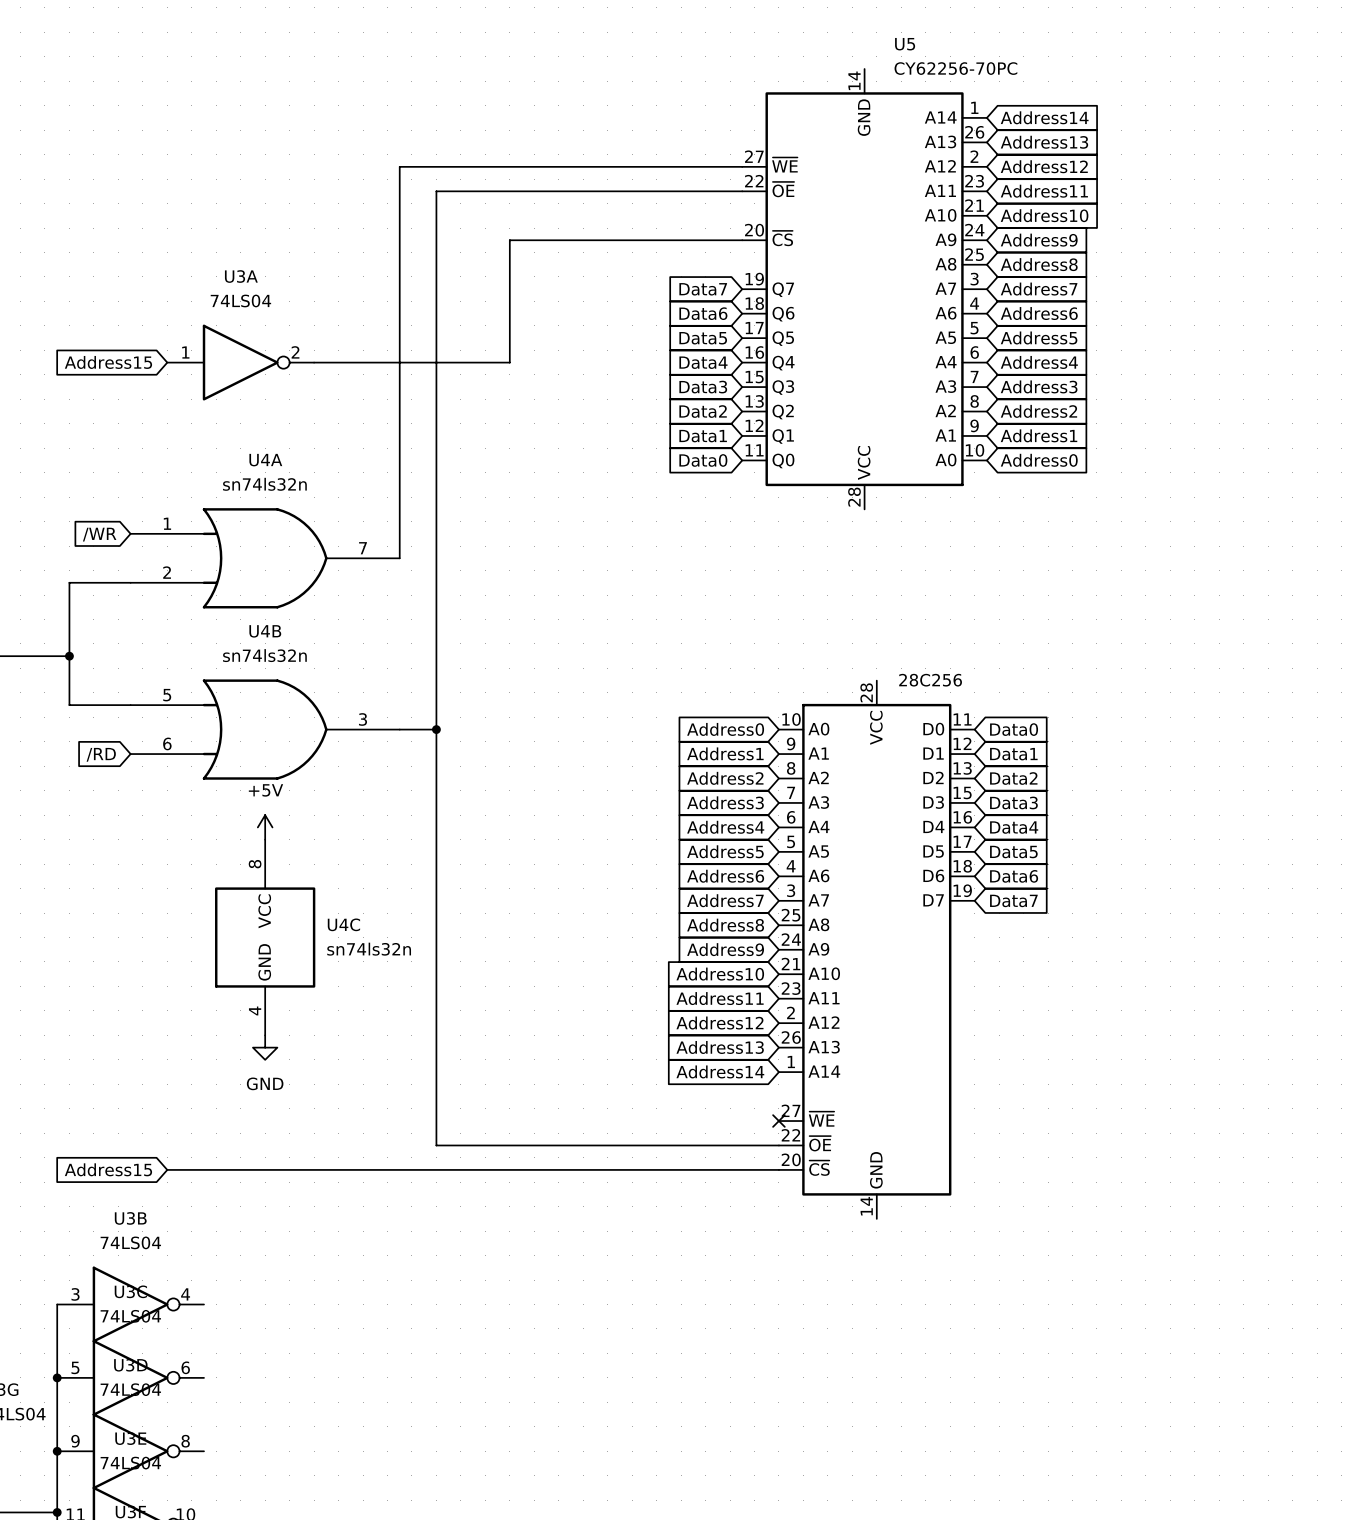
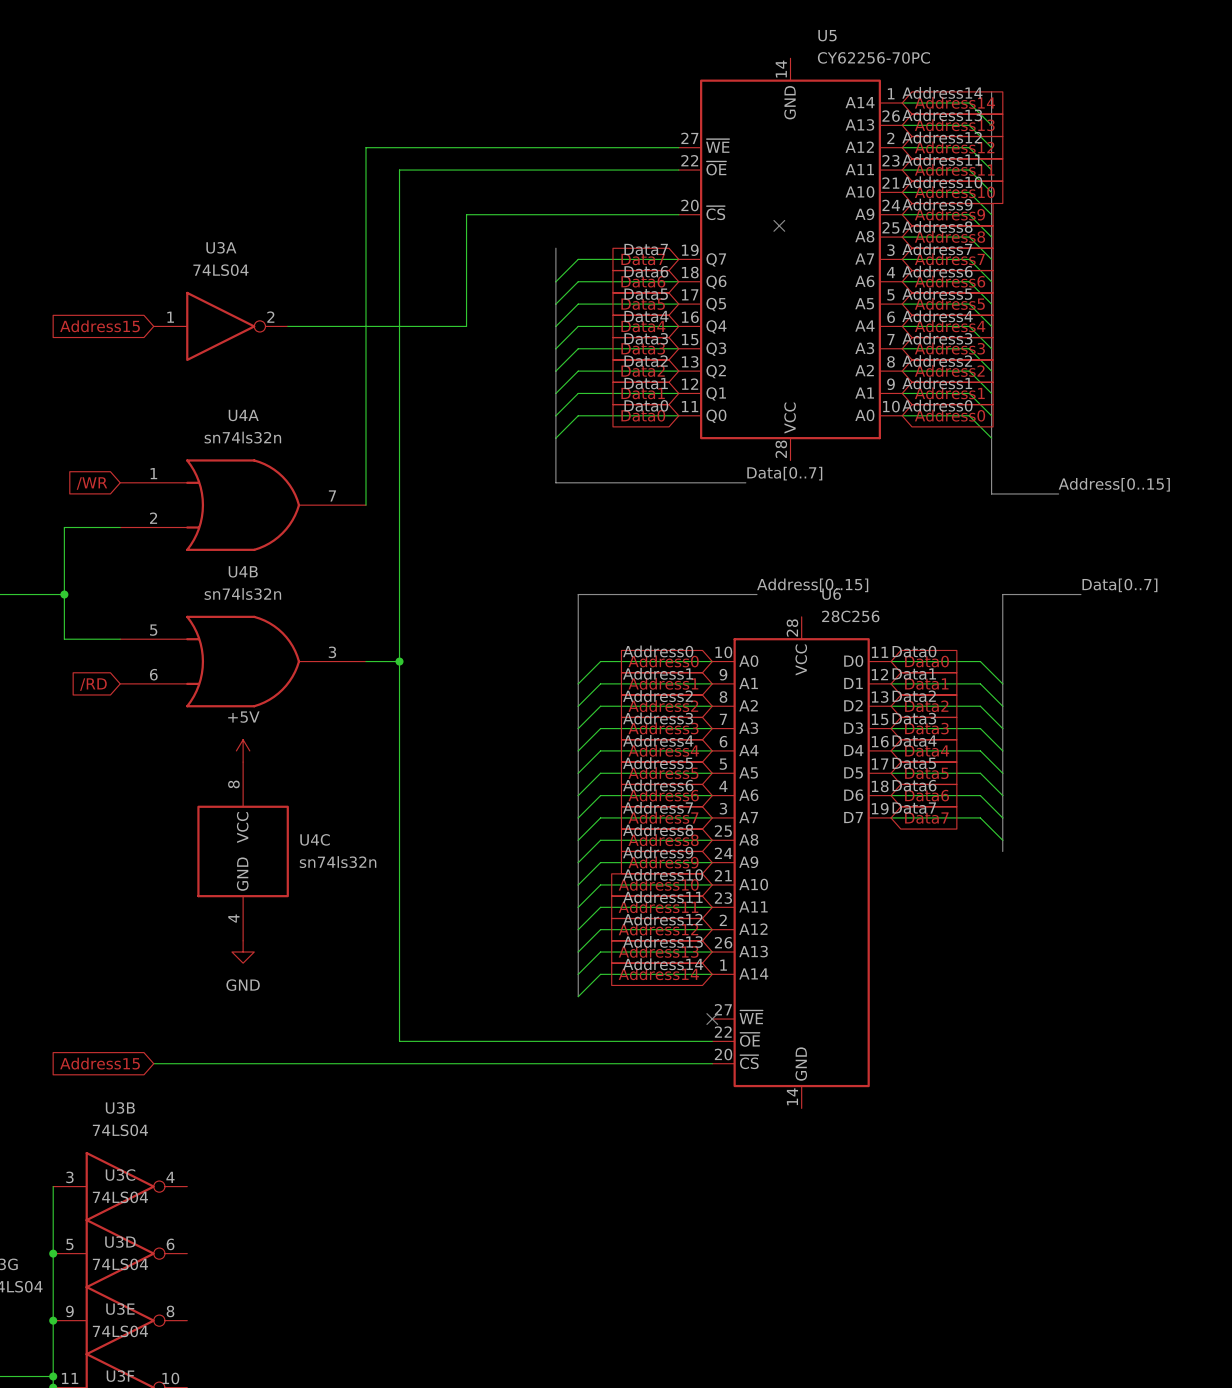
bus: none -> (991, 91) (991, 493) (1058, 493)
label: none -> Address14 (942, 92)
wire: none -> (902, 103) (969, 103) (991, 125)
label: none -> Address13 (942, 115)
wire: none -> (902, 125) (969, 125) (991, 147)
label: none -> Address12 (942, 137)
wire: none -> (902, 147) (969, 147) (991, 170)
label: none -> Address11 (942, 159)
wire: none -> (902, 170) (969, 170) (991, 192)
label: none -> Address10 (942, 182)
wire: none -> (902, 192) (969, 192) (991, 214)
label: none -> Address9 (937, 204)
wire: none -> (902, 214) (969, 214) (991, 237)
no-connect mark: none -> (779, 225)
label: none -> Address8 (937, 226)
wire: none -> (902, 237) (969, 237) (991, 259)
bus: none -> (555, 248) (555, 482) (745, 482)
label: none -> Data7 (646, 249)
label: none -> Address7 (937, 249)
wire: none -> (678, 259) (578, 259) (555, 281)
wire: none -> (902, 259) (969, 259) (991, 281)
label: none -> Data6 (646, 271)
label: none -> Address6 (937, 271)
wire: none -> (678, 281) (578, 281) (555, 304)
wire: none -> (902, 281) (969, 281) (991, 304)
label: none -> Data5 (646, 294)
label: none -> Address5 (937, 293)
wire: none -> (678, 304) (578, 304) (555, 326)
wire: none -> (902, 304) (969, 304) (991, 326)
label: none -> Data4 (646, 316)
label: none -> Address4 (937, 316)
wire: none -> (678, 326) (578, 326) (555, 348)
wire: none -> (902, 326) (969, 326) (991, 348)
label: none -> Data3 (646, 338)
label: none -> Address3 (937, 338)
wire: none -> (678, 348) (578, 348) (555, 371)
wire: none -> (902, 348) (969, 348) (991, 371)
label: none -> Data2 (646, 361)
label: none -> Address2 (937, 361)
wire: none -> (678, 371) (578, 371) (555, 393)
wire: none -> (902, 371) (969, 371) (991, 393)
label: none -> Address1 (937, 383)
label: none -> Data1 (646, 383)
wire: none -> (678, 393) (578, 393) (555, 415)
wire: none -> (902, 393) (969, 393) (991, 415)
label: none -> Data0 (646, 405)
label: none -> Address0 (937, 405)
wire: none -> (678, 415) (578, 415) (555, 438)
wire: none -> (902, 415) (969, 415) (991, 438)
label: none -> Data[0..7] (784, 473)
label: none -> Address[0..15] (1114, 484)
label: none -> Address[0..15] (812, 585)
label: none -> Data[0..7] (1119, 585)
U6 name: none -> U6 (831, 594)
bus: none -> (756, 594) (578, 594) (578, 996)
bus: none -> (1080, 594) (1002, 594) (1002, 851)
label: none -> Address0 (658, 651)
label: none -> Data0 (914, 651)
wire: none -> (712, 661) (600, 661) (578, 683)
wire: none -> (891, 661) (980, 661) (1002, 683)
label: none -> Address1 (657, 673)
label: none -> Data1 (914, 674)
wire: none -> (712, 683) (600, 683) (578, 706)
wire: none -> (891, 683) (980, 683) (1002, 706)
label: none -> Address2 (657, 696)
label: none -> Data2 (914, 696)
wire: none -> (712, 706) (600, 706) (578, 728)
wire: none -> (891, 706) (980, 706) (1002, 728)
label: none -> Address3 (658, 718)
label: none -> Data3 (914, 718)
wire: none -> (712, 728) (600, 728) (578, 750)
wire: none -> (891, 728) (980, 728) (1002, 750)
label: none -> Address4 (658, 740)
label: none -> Data4 (914, 741)
wire: none -> (712, 750) (600, 750) (578, 773)
wire: none -> (891, 750) (980, 750) (1002, 773)
label: none -> Address5 (658, 763)
label: none -> Data5 (914, 763)
wire: none -> (712, 773) (600, 773) (578, 795)
wire: none -> (891, 773) (980, 773) (1002, 795)
label: none -> Address6 (658, 785)
label: none -> Data6 (914, 785)
wire: none -> (712, 795) (600, 795) (578, 817)
wire: none -> (891, 795) (980, 795) (1002, 817)
label: none -> Address7 (658, 807)
label: none -> Data7 (914, 808)
wire: none -> (712, 817) (600, 817) (578, 840)
wire: none -> (891, 817) (980, 817) (1002, 840)
label: none -> Address8 (658, 830)
wire: none -> (712, 840) (600, 840) (578, 862)
label: none -> Address9 (658, 852)
wire: none -> (712, 862) (600, 862) (578, 884)
label: none -> Address10 (663, 874)
wire: none -> (712, 884) (600, 884) (578, 907)
label: none -> Address11 (662, 897)
wire: none -> (712, 907) (600, 907) (578, 929)
label: none -> Address12 (662, 919)
wire: none -> (712, 929) (600, 929) (578, 952)
label: none -> Address13 (662, 941)
wire: none -> (712, 952) (600, 952) (578, 974)
label: none -> Address14 (663, 964)
wire: none -> (712, 974) (600, 974) (578, 996)

